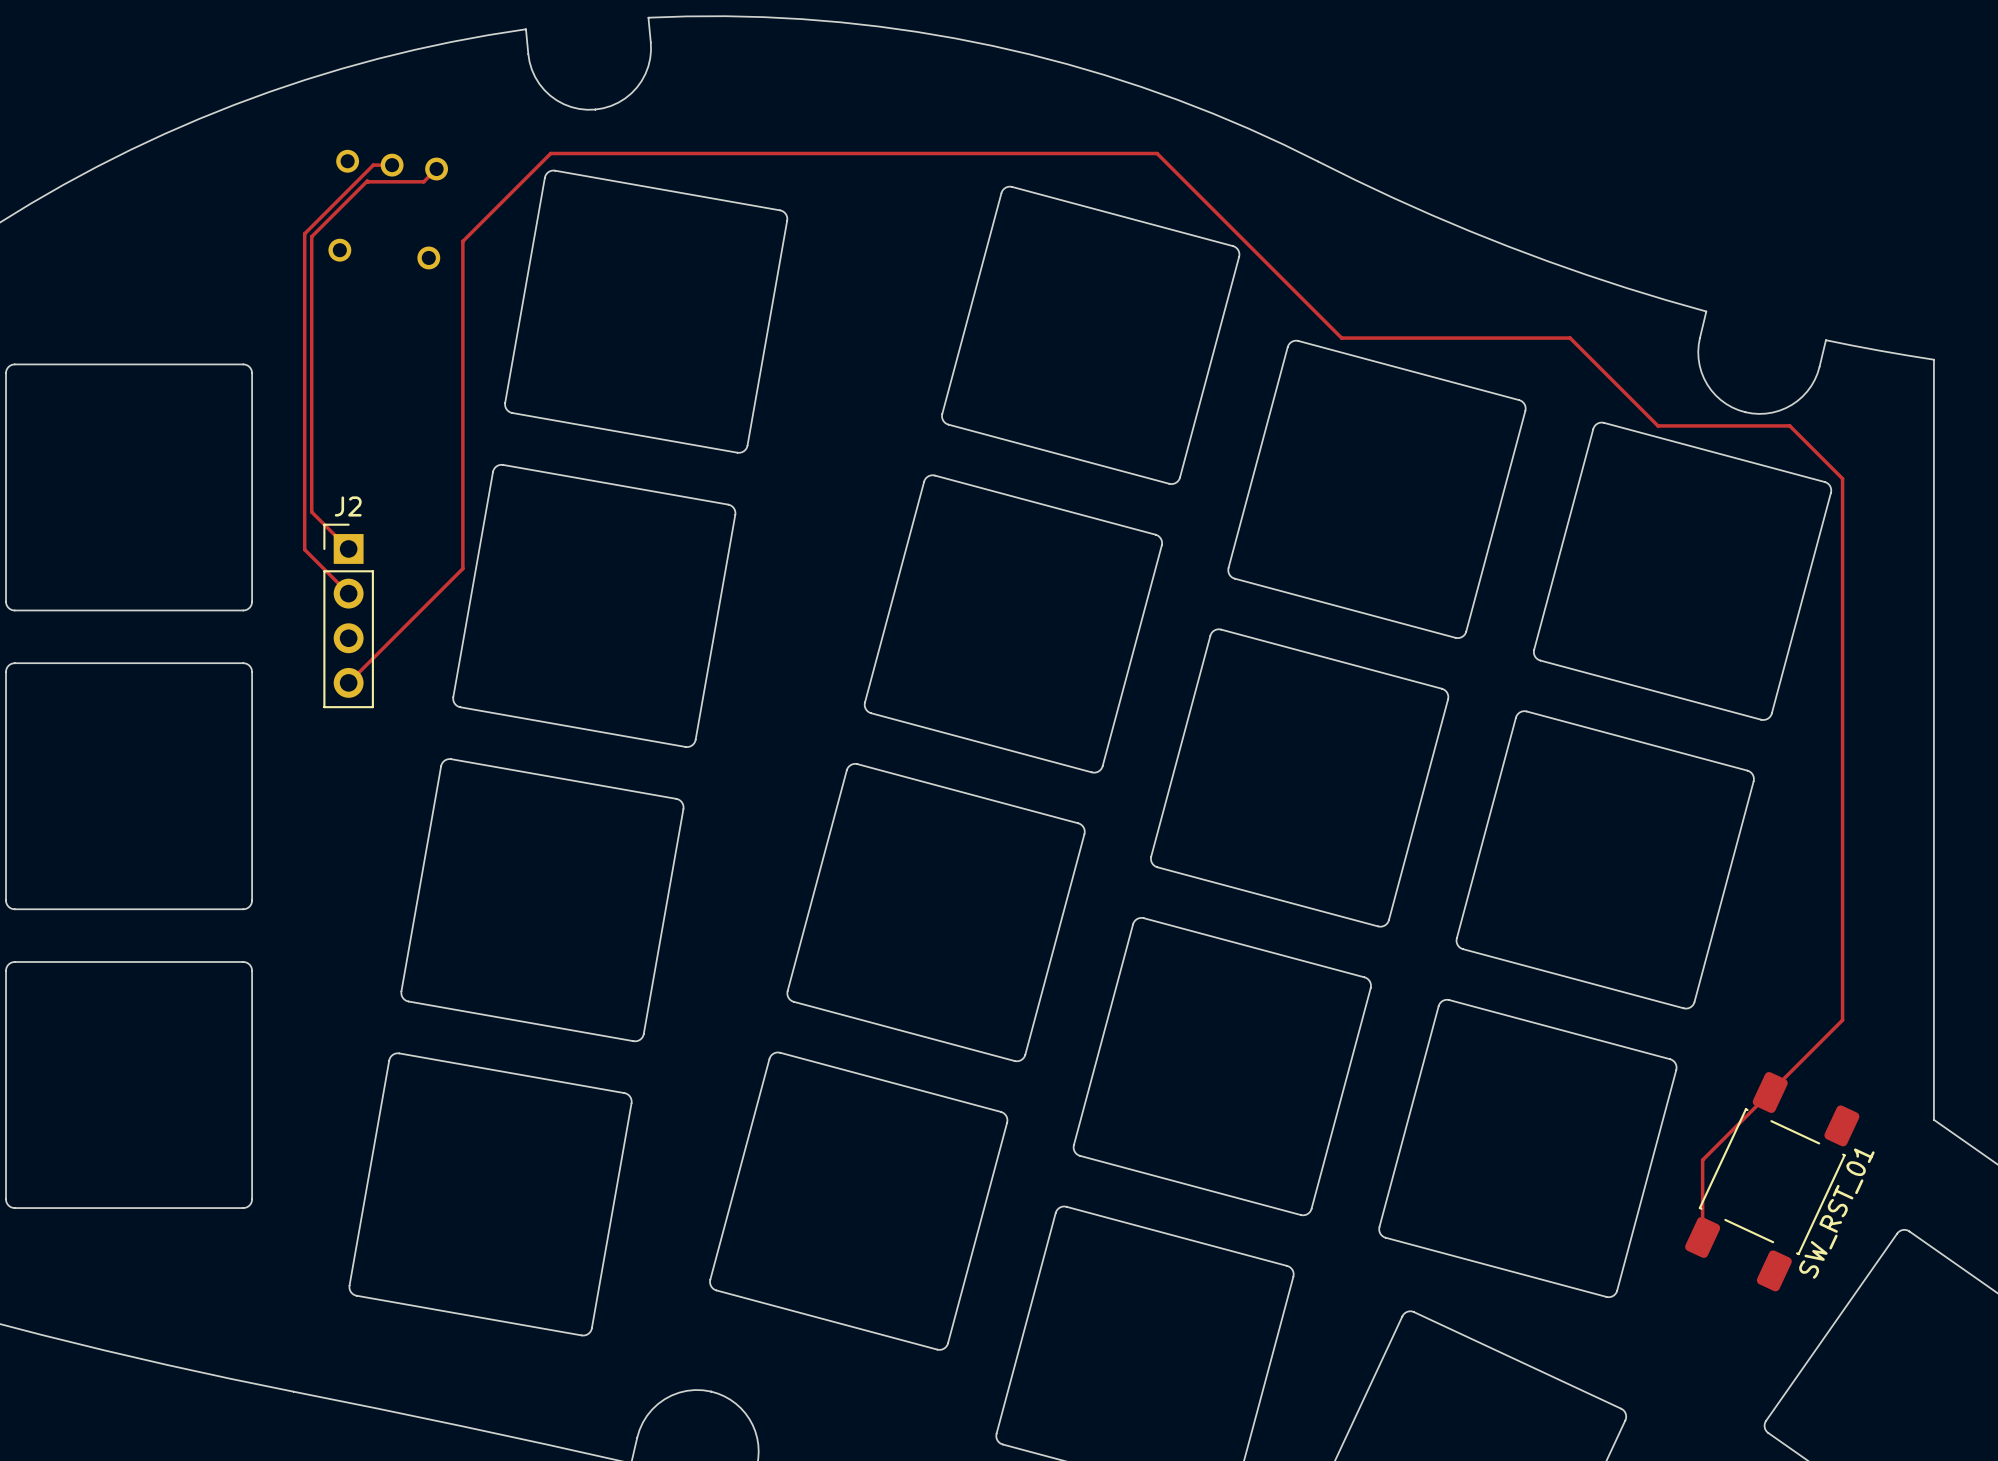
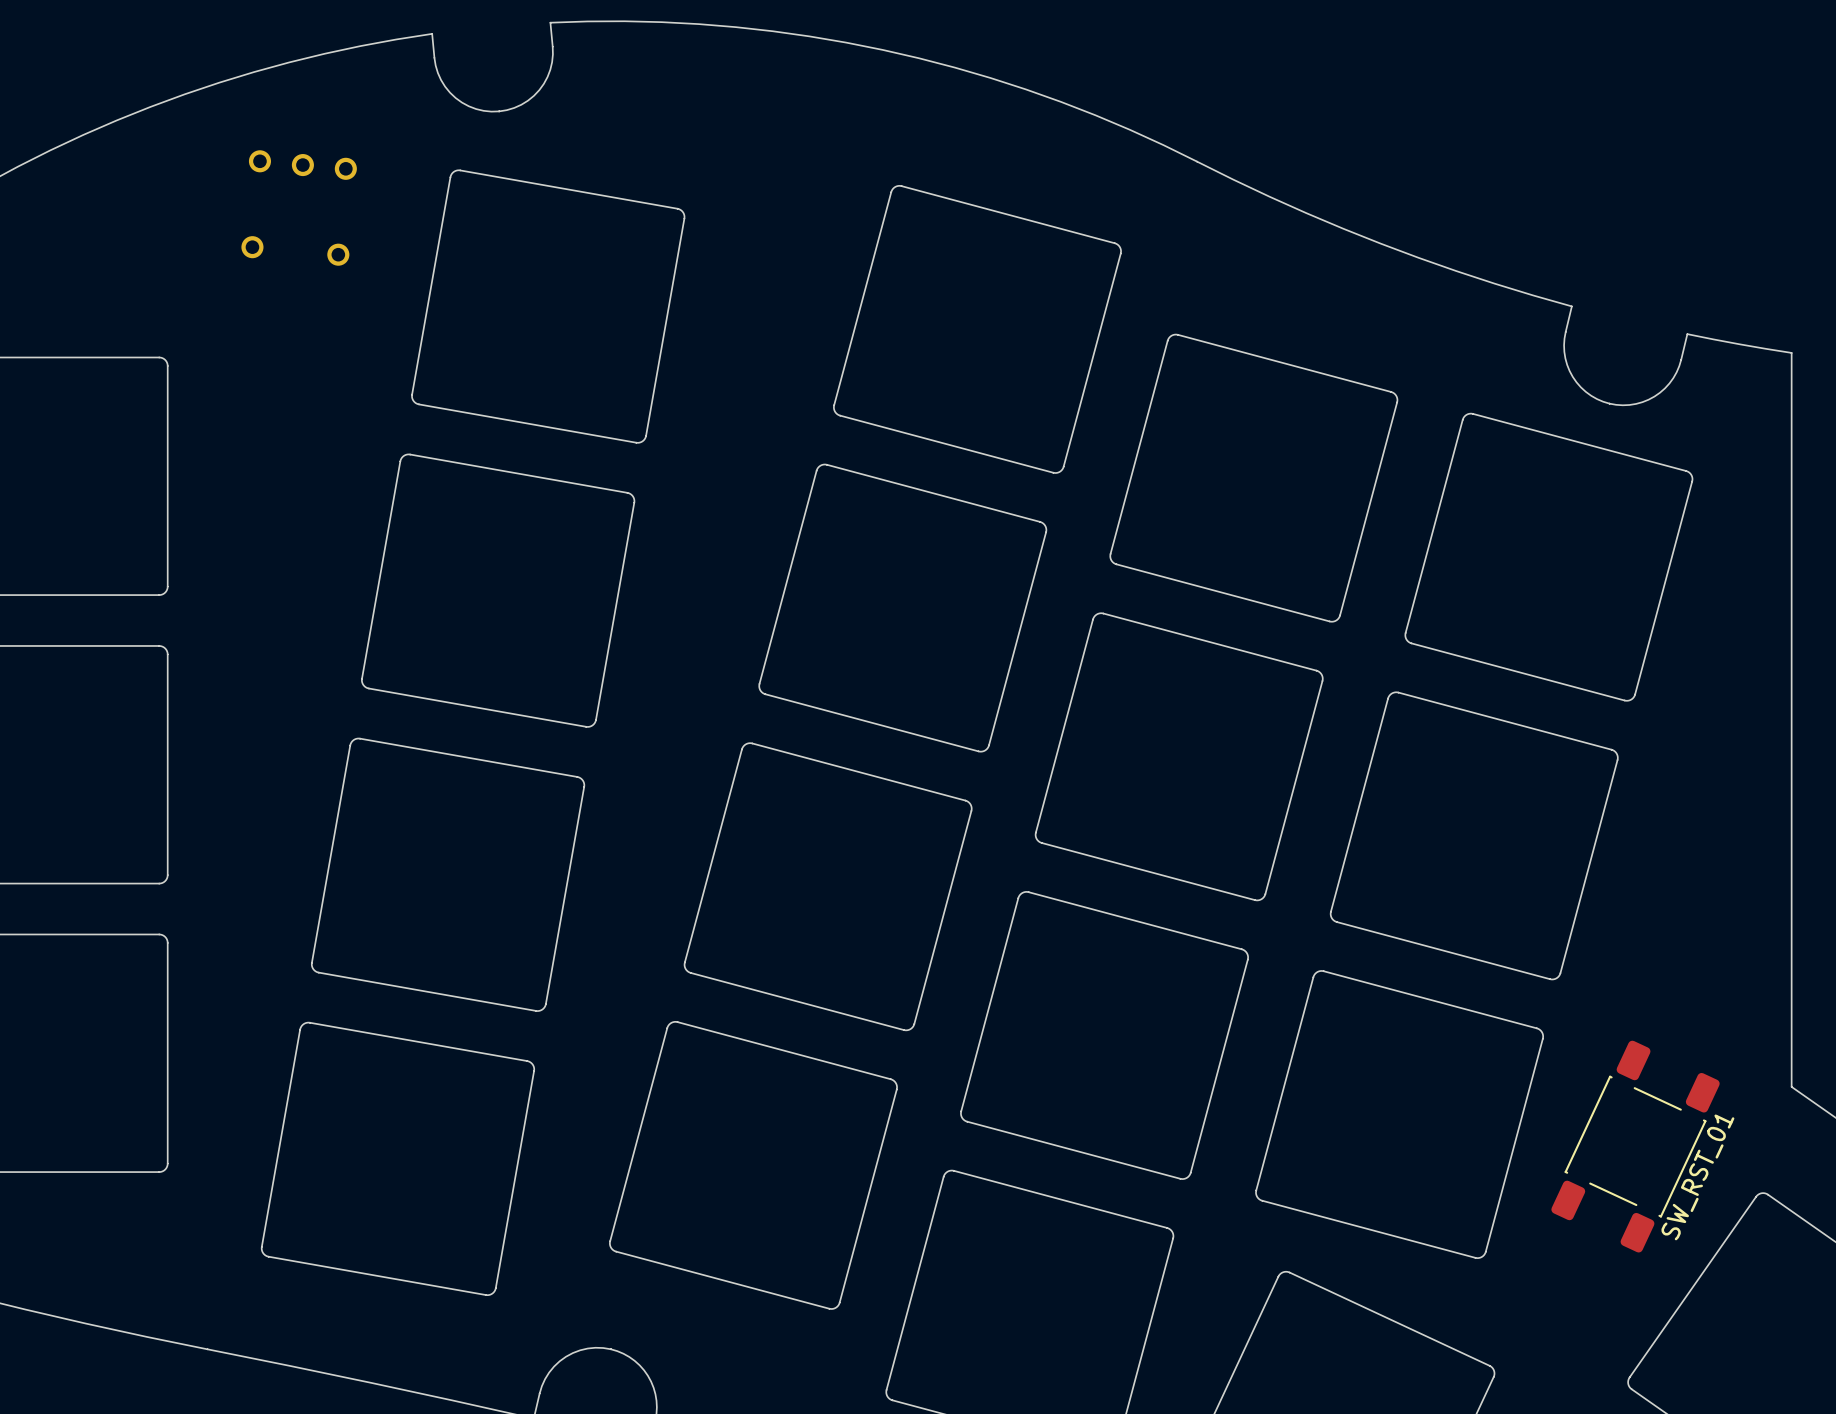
top track: (392, 165) (373, 165) (304, 233) (304, 549) (348, 593) -> none
top track: (436, 169) (423, 181) (367, 181) (311, 236) (311, 512) (348, 548) -> none
J2: (348, 615) -> none
top track: (348, 682) (462, 568) (462, 241) (550, 153) (1157, 153) (1341, 338) (1570, 338) (1658, 425) (1789, 425) (1842, 478) (1842, 1020) (1702, 1160) (1702, 1237) -> none

